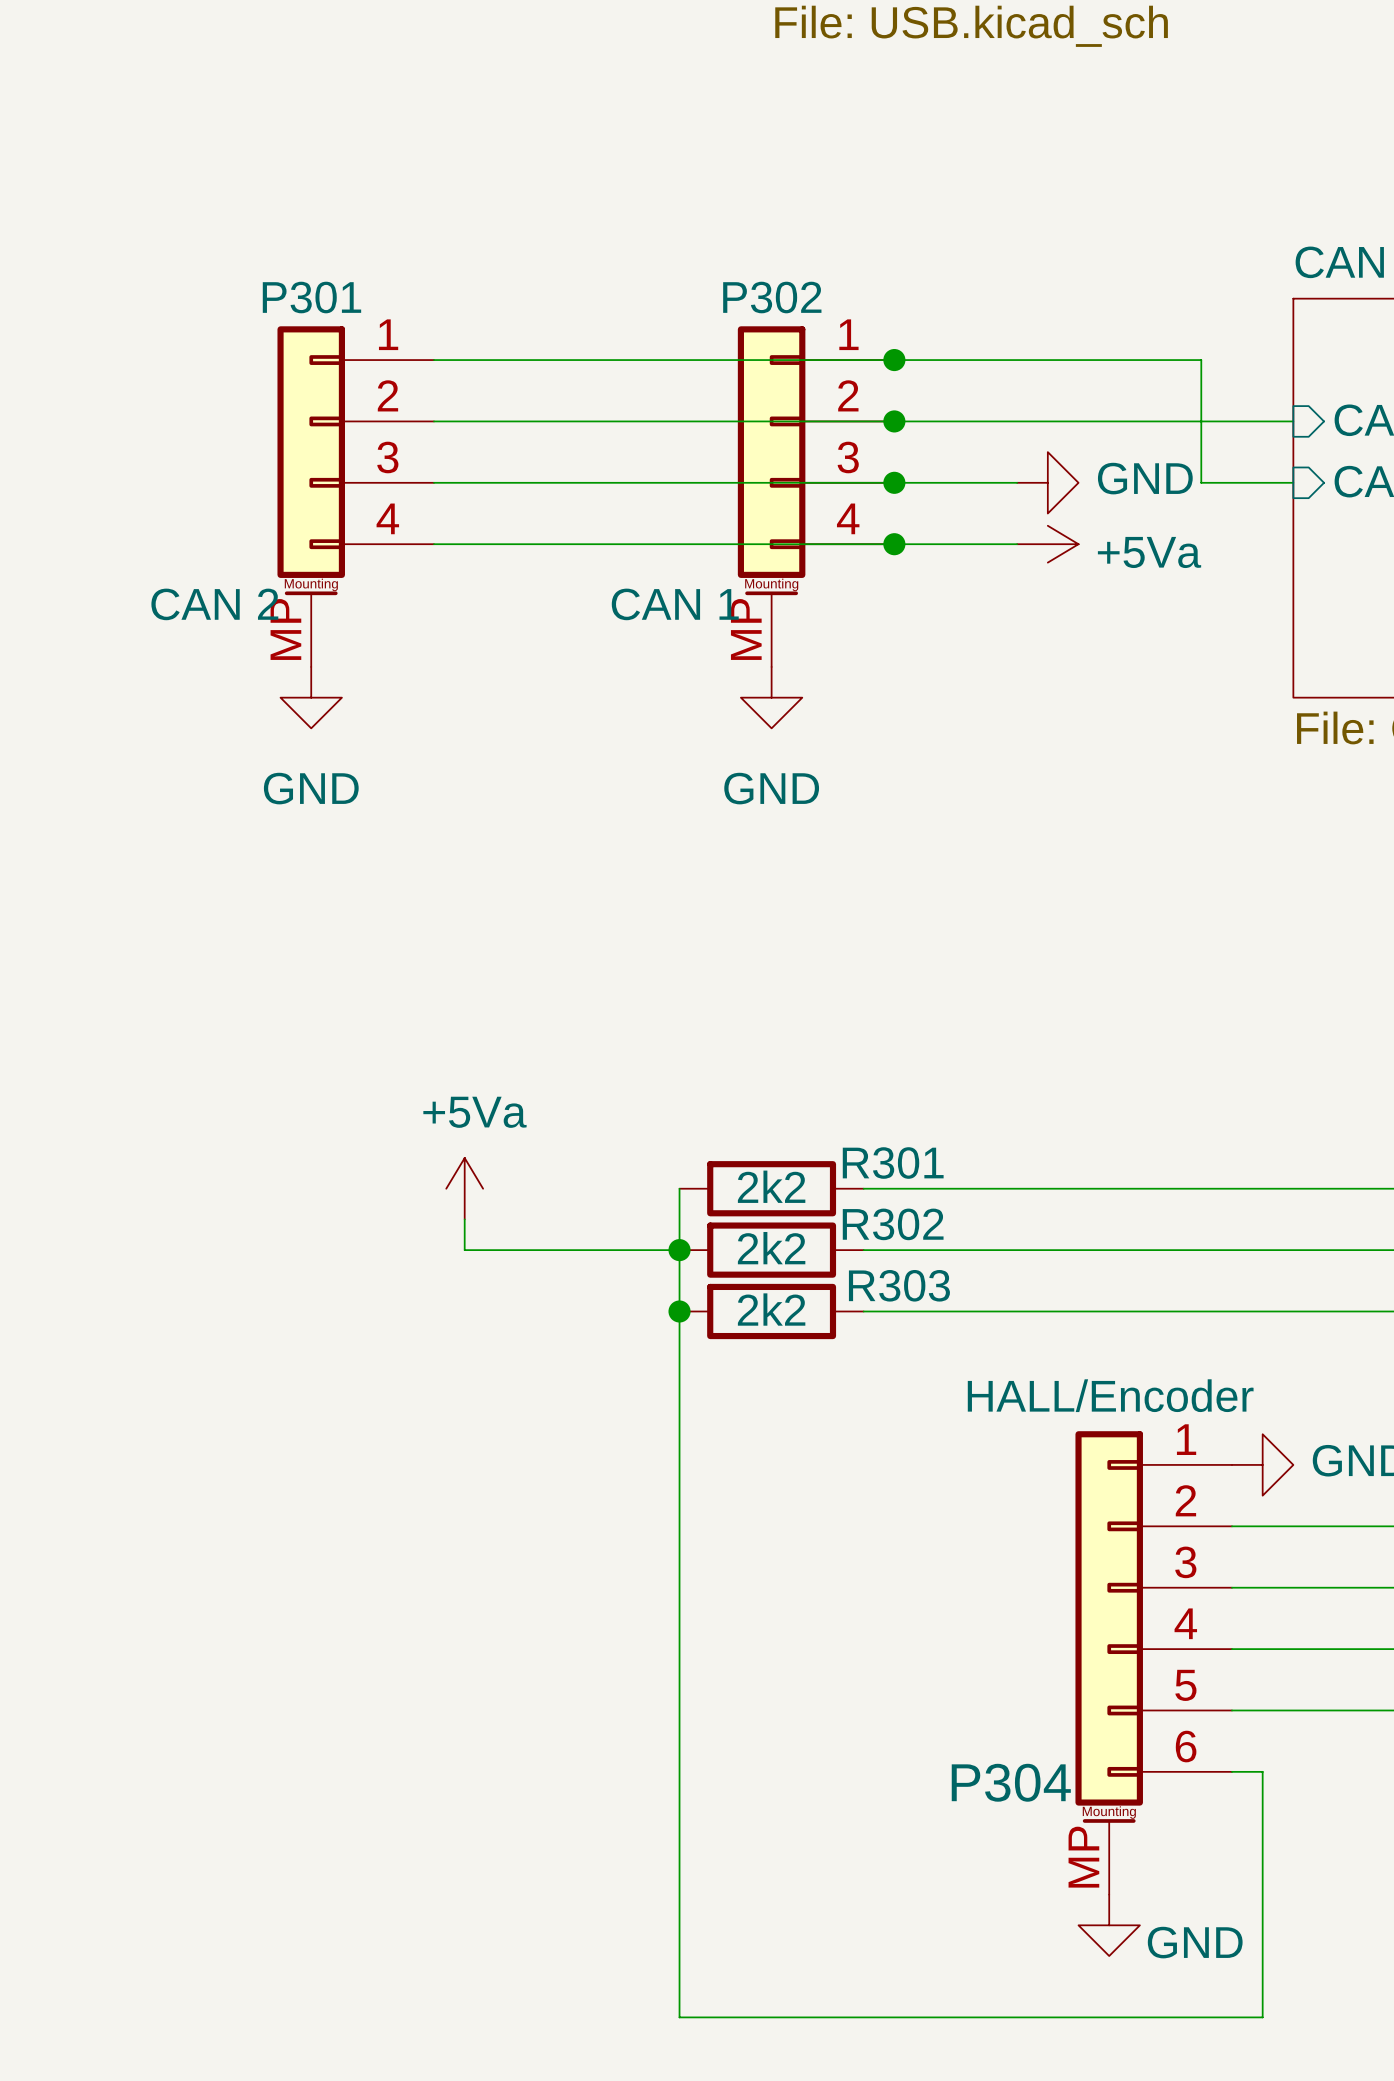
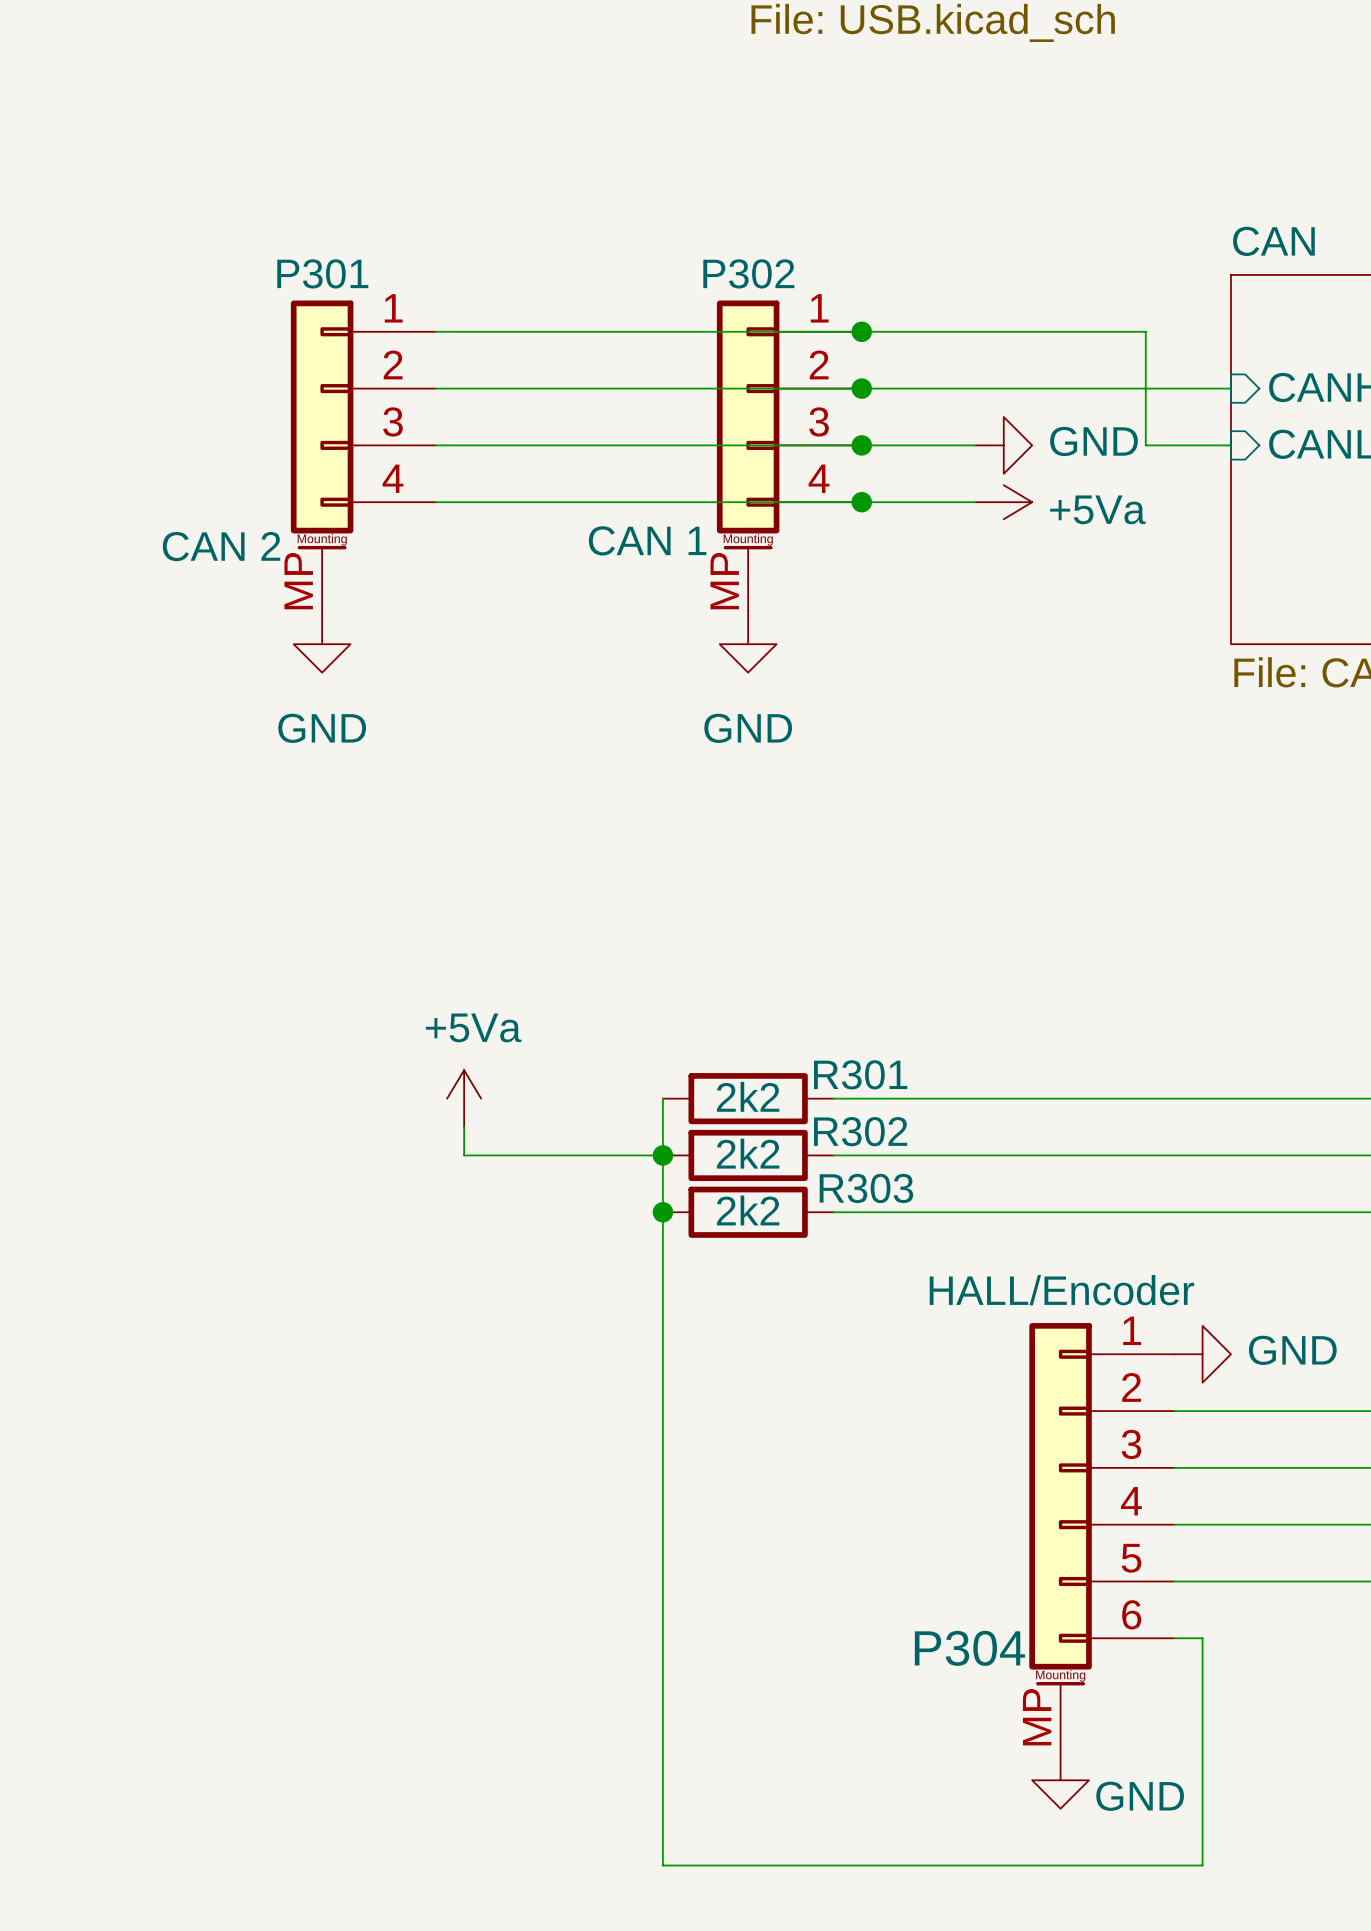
P301 value position: CAN 2 (214, 604) -> CAN 2 (221, 546)
P302 value position: CAN 1 (675, 604) -> CAN 1 (647, 540)

